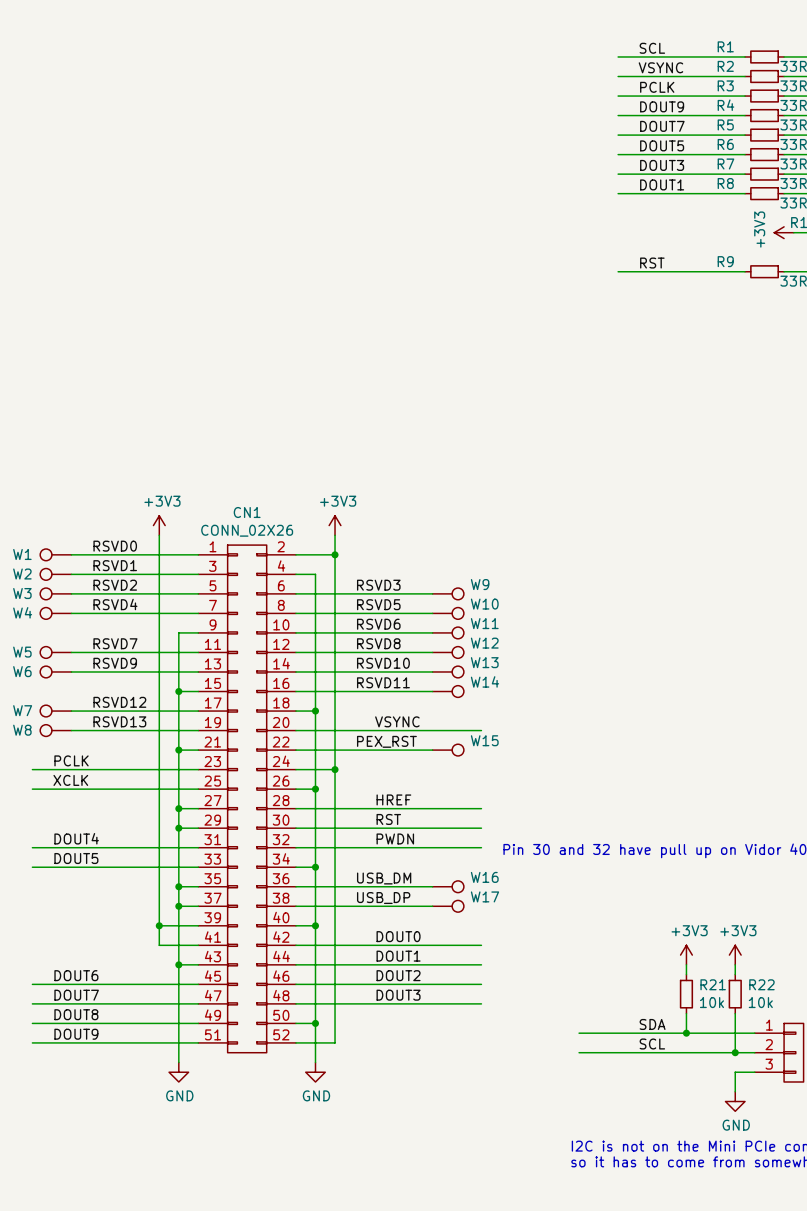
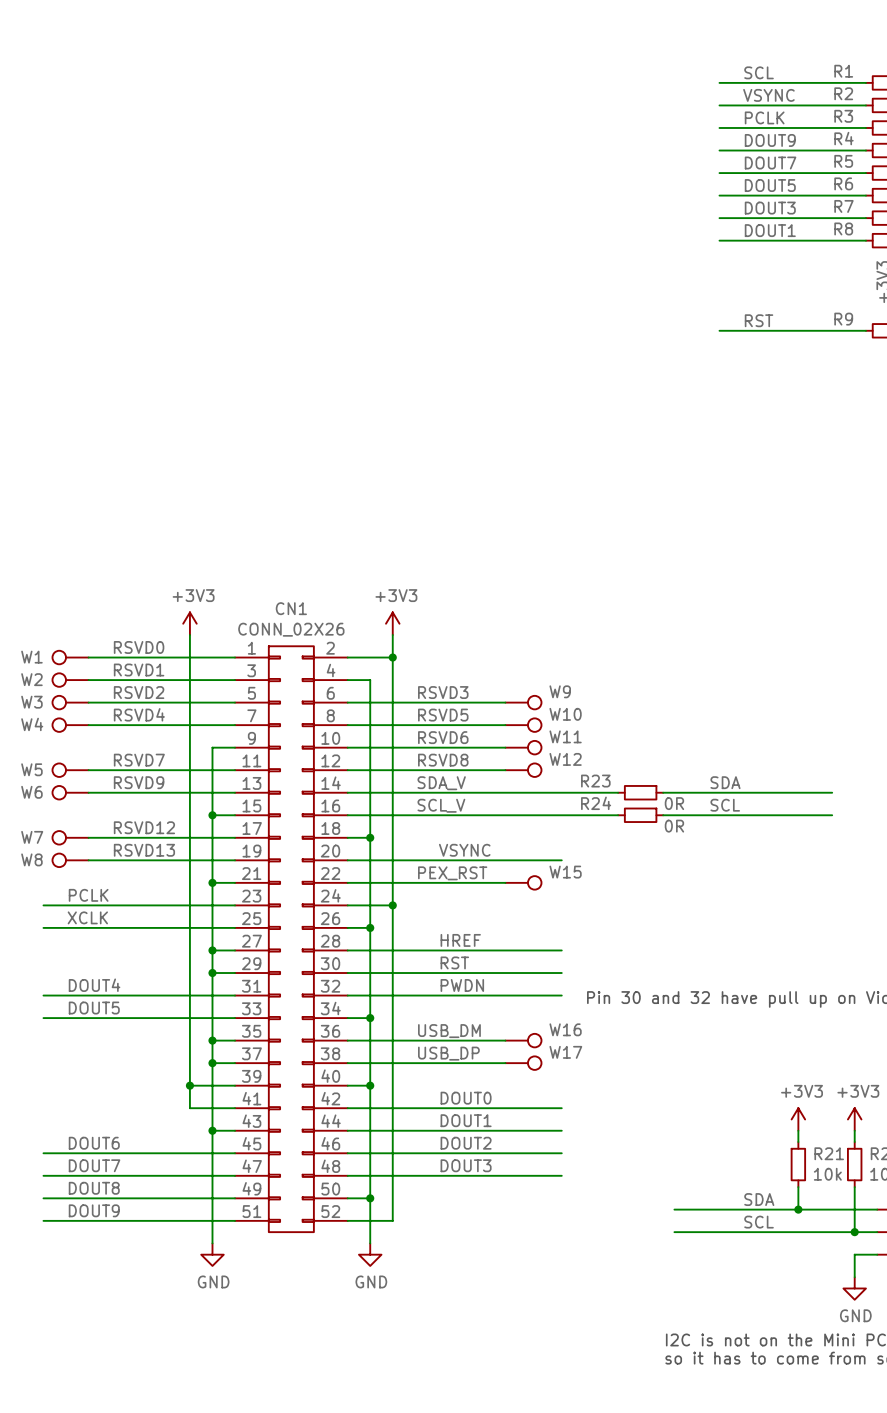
label: RSVD10 (383, 663) -> SDA_V (441, 783)
label: none -> SDA (725, 782)
wire: none -> (505, 792) (618, 792)
W13: (448, 671) -> none
R23: none -> 0R (640, 792)
wire: none -> (663, 792) (832, 792)
label: RSVD11 (383, 682) -> SCL_V (441, 805)
label: none -> SCL (725, 805)
wire: none -> (505, 815) (618, 815)
W14: (448, 691) -> none
R24: none -> 0R (640, 815)
wire: none -> (663, 815) (832, 815)

